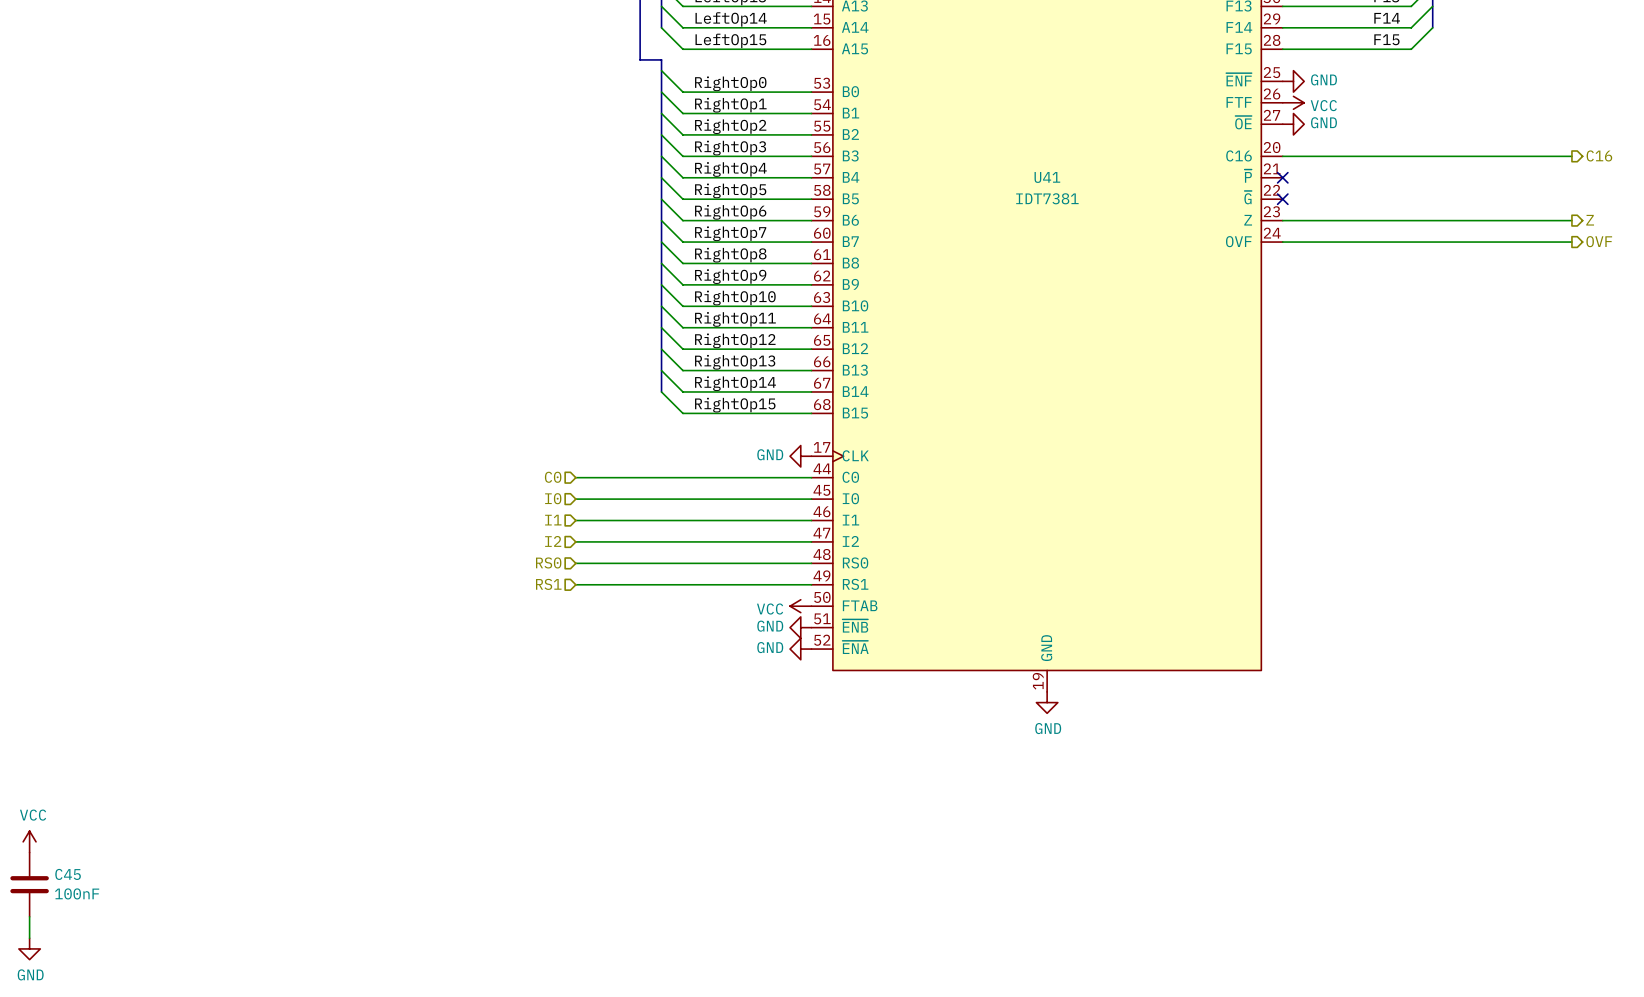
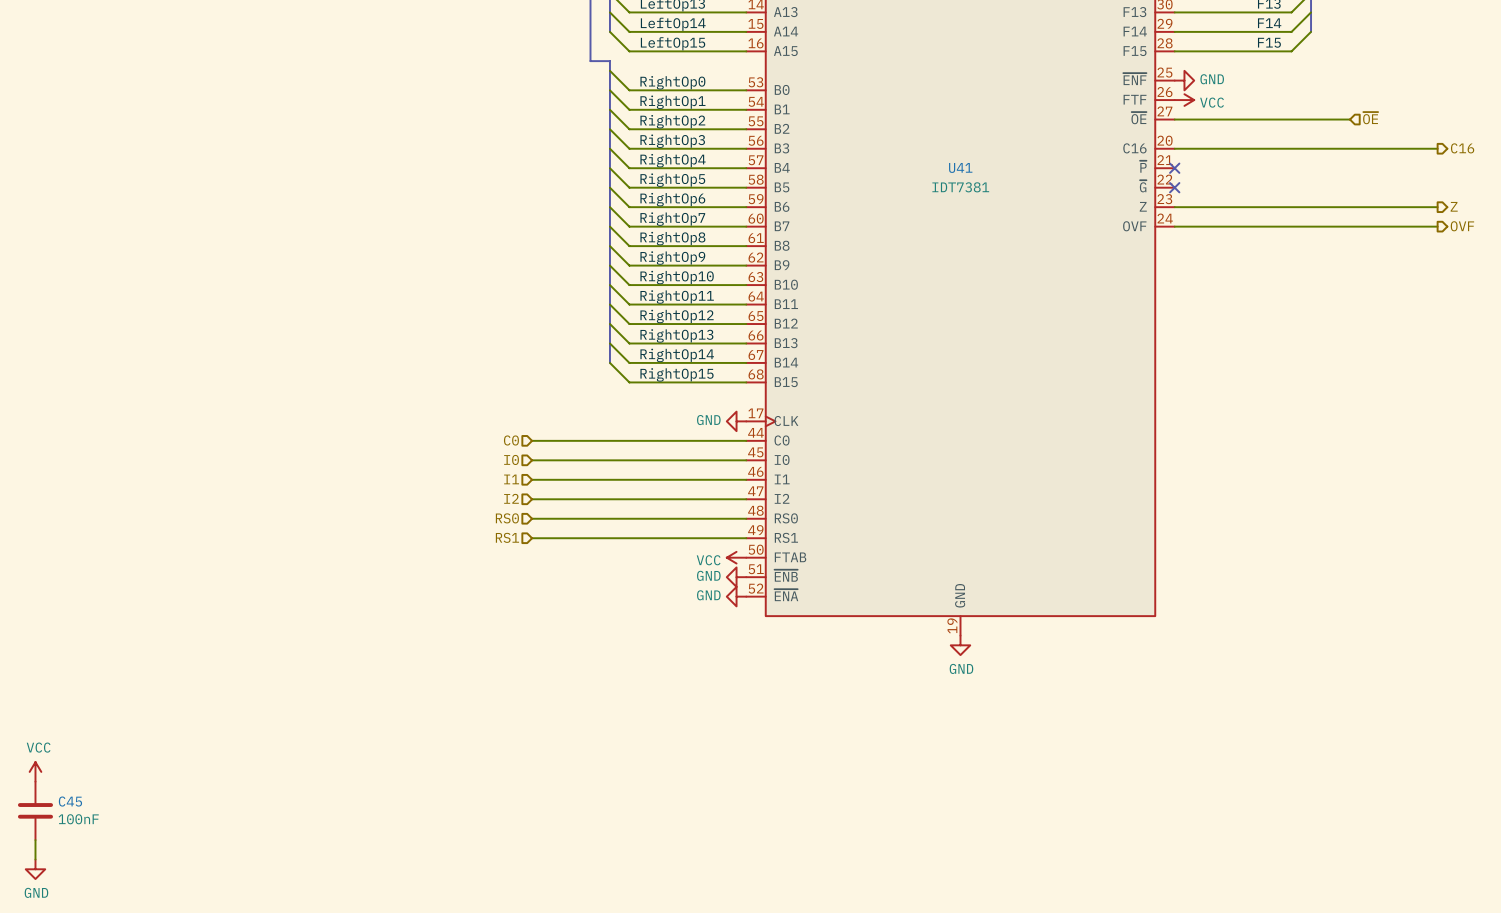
hierarchical label: none -> ~{OE} (1370, 118)
wire: none -> (1174, 119) (1349, 119)
power symbol: GND (1293, 124) -> none

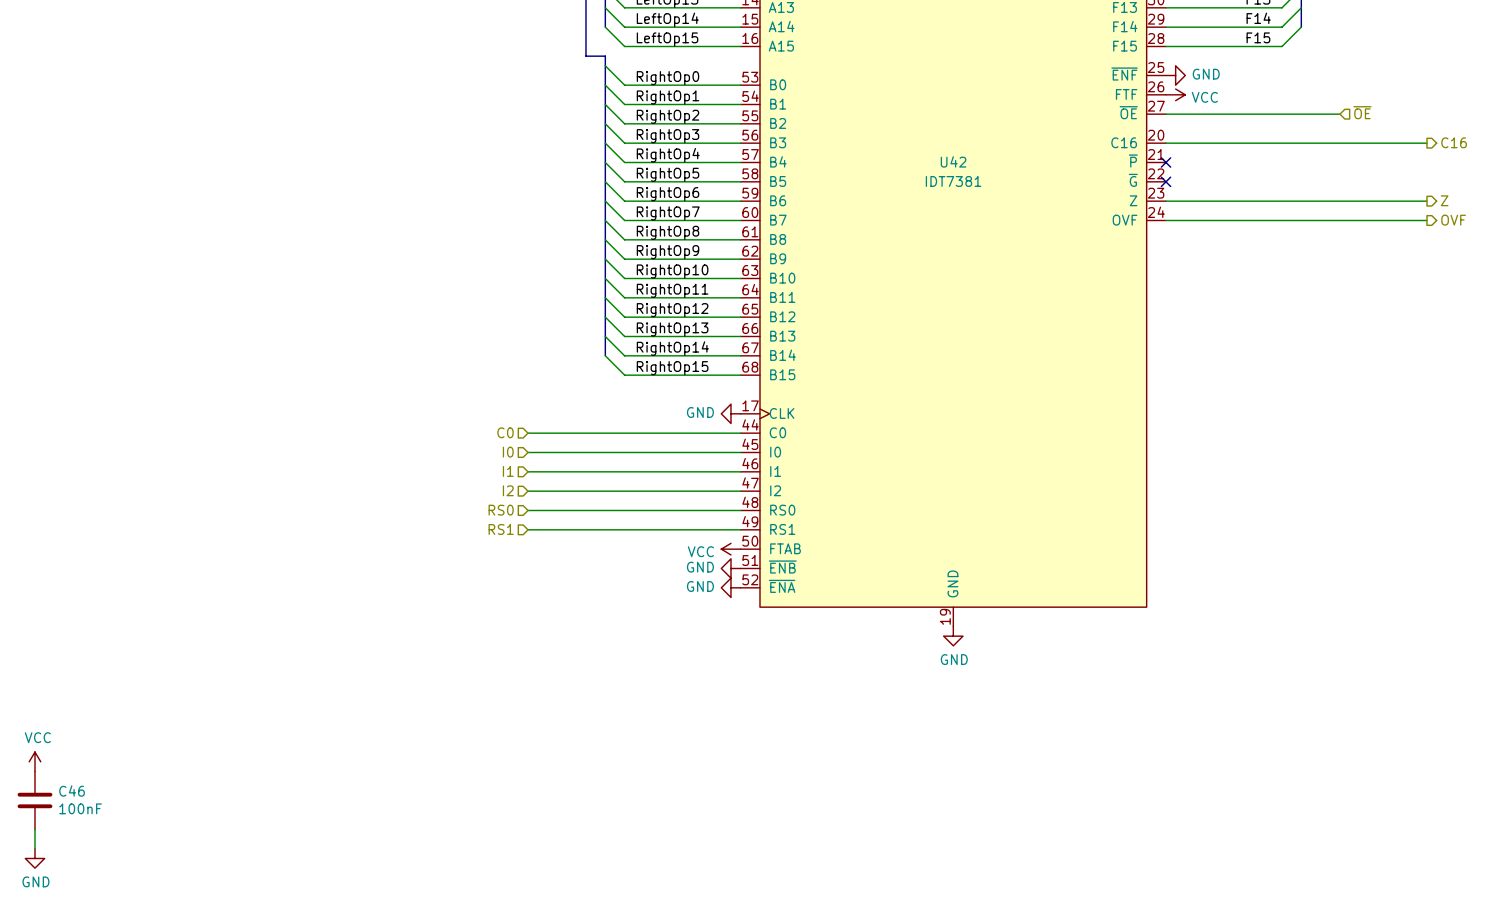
U41 name: U41 (960, 167) -> U42 (953, 161)
C45 name: C45 (70, 801) -> C46 (72, 791)

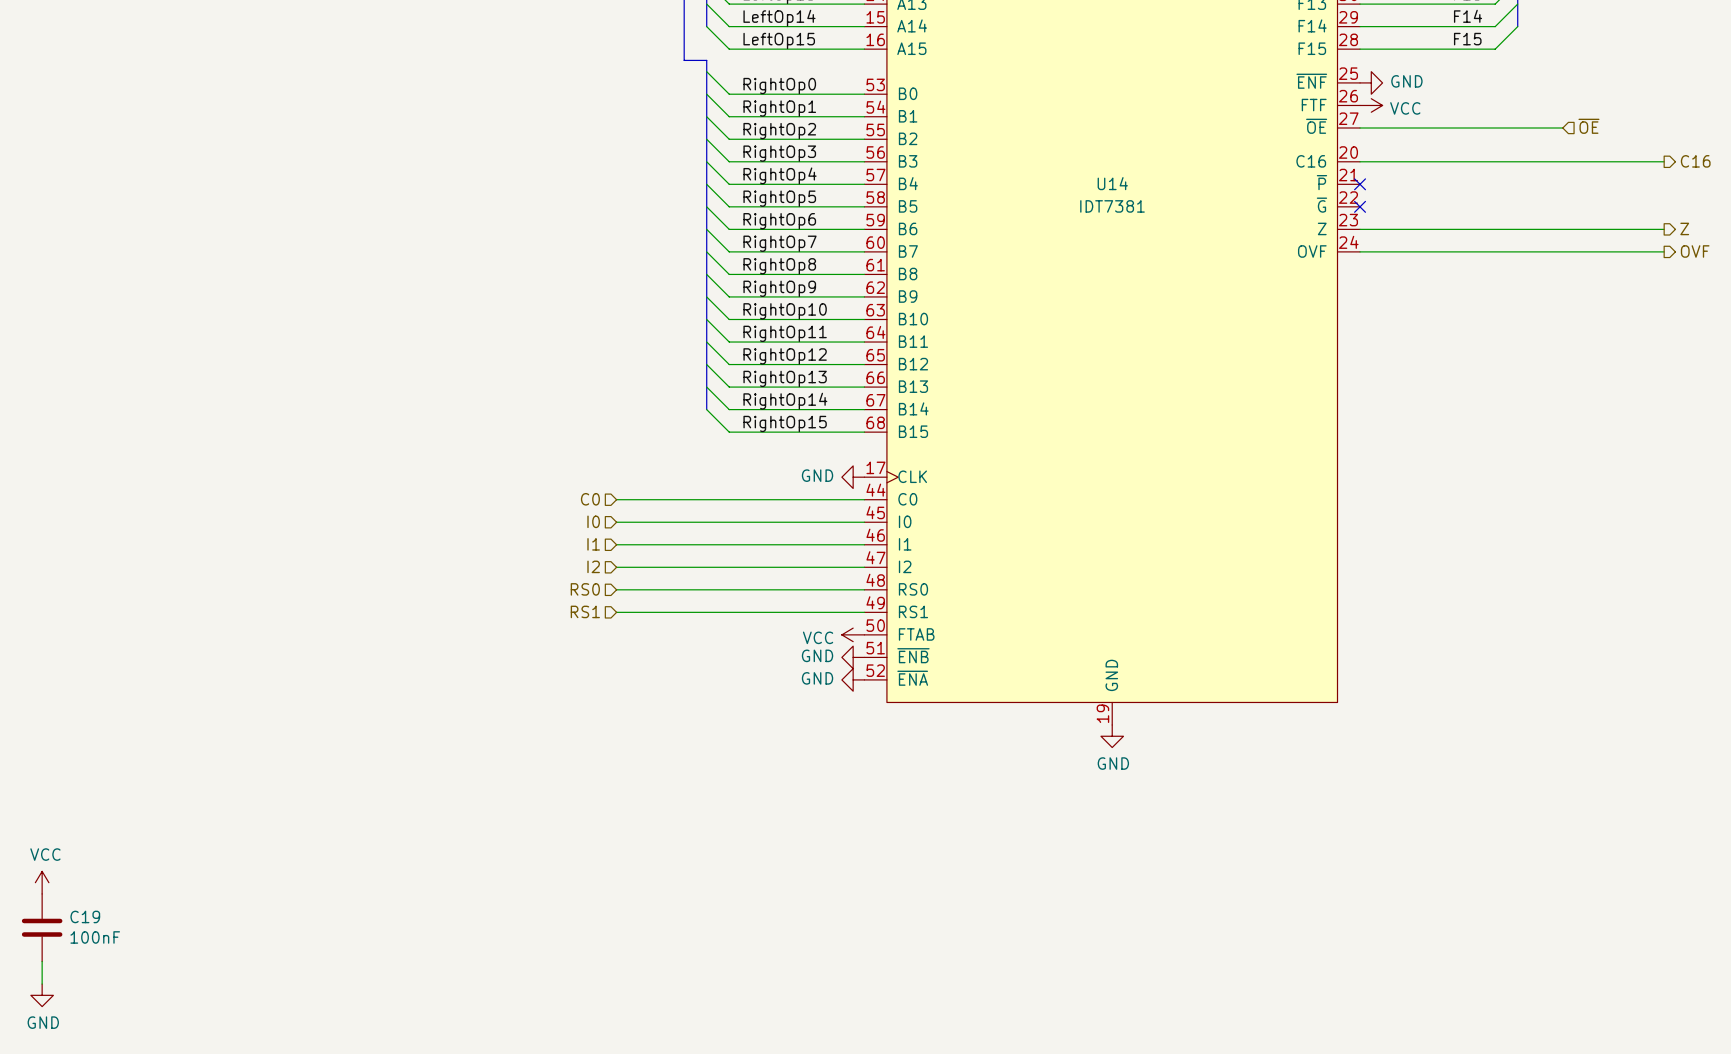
U42 name: U42 (953, 161) -> U14 (1112, 183)
C46 name: C46 (72, 791) -> C19 (85, 916)

